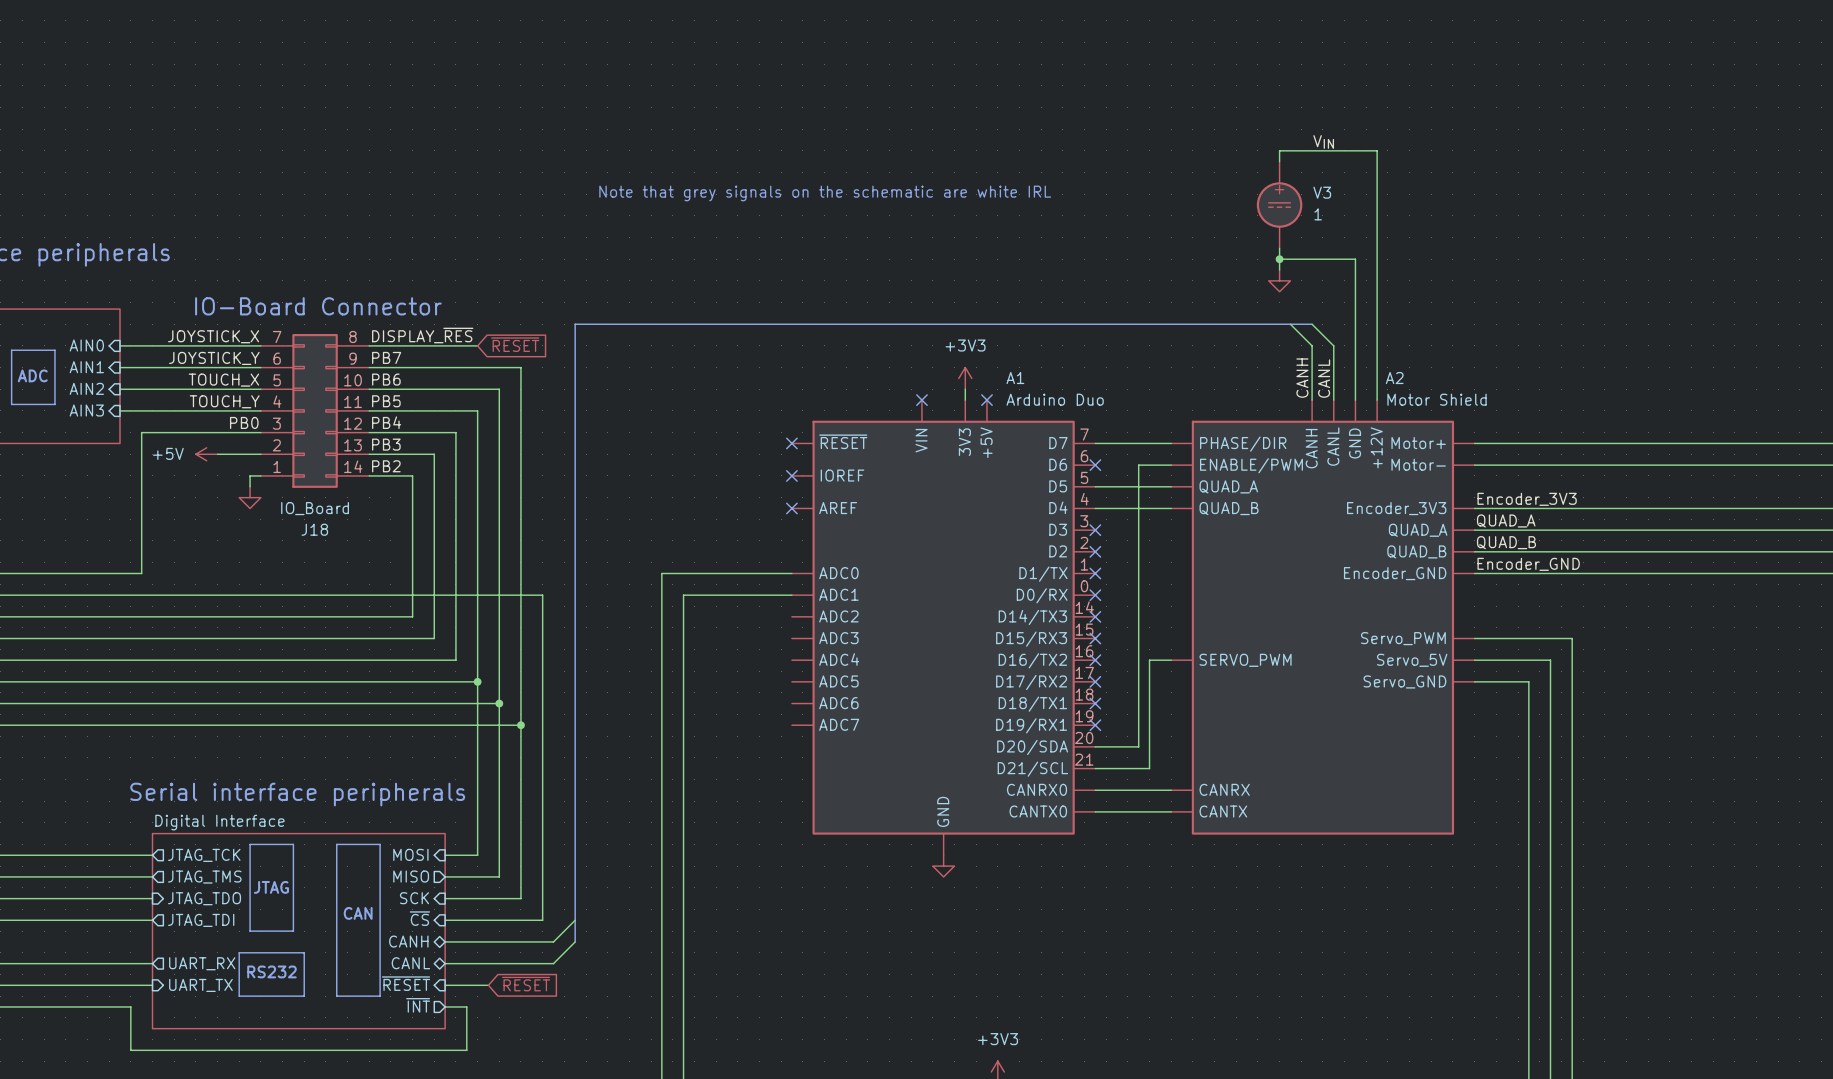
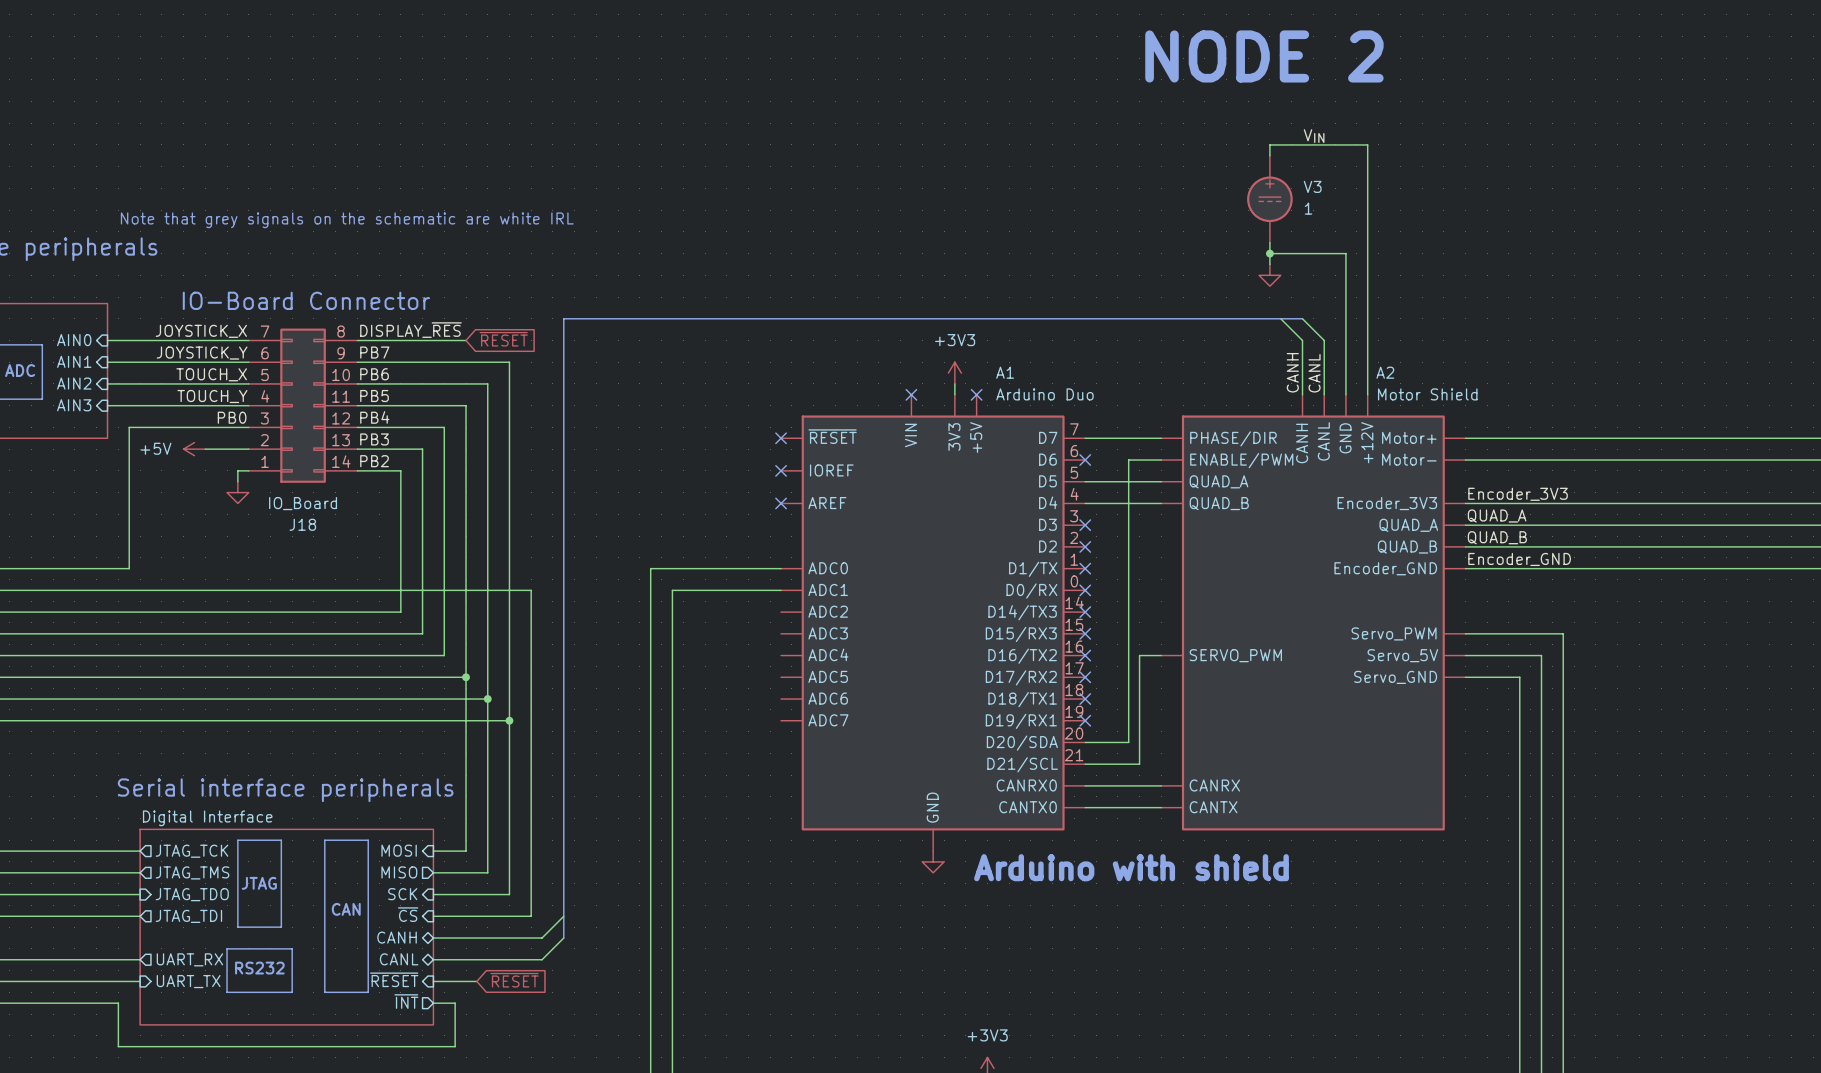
text: none -> NODE 2 (1264, 56)
text: Note that grey signals on the schematic are white IRL (825, 193) -> none
text: none -> Note that grey signals on the schematic are white IRL (347, 220)
text: none -> Arduino with shield (1131, 867)

